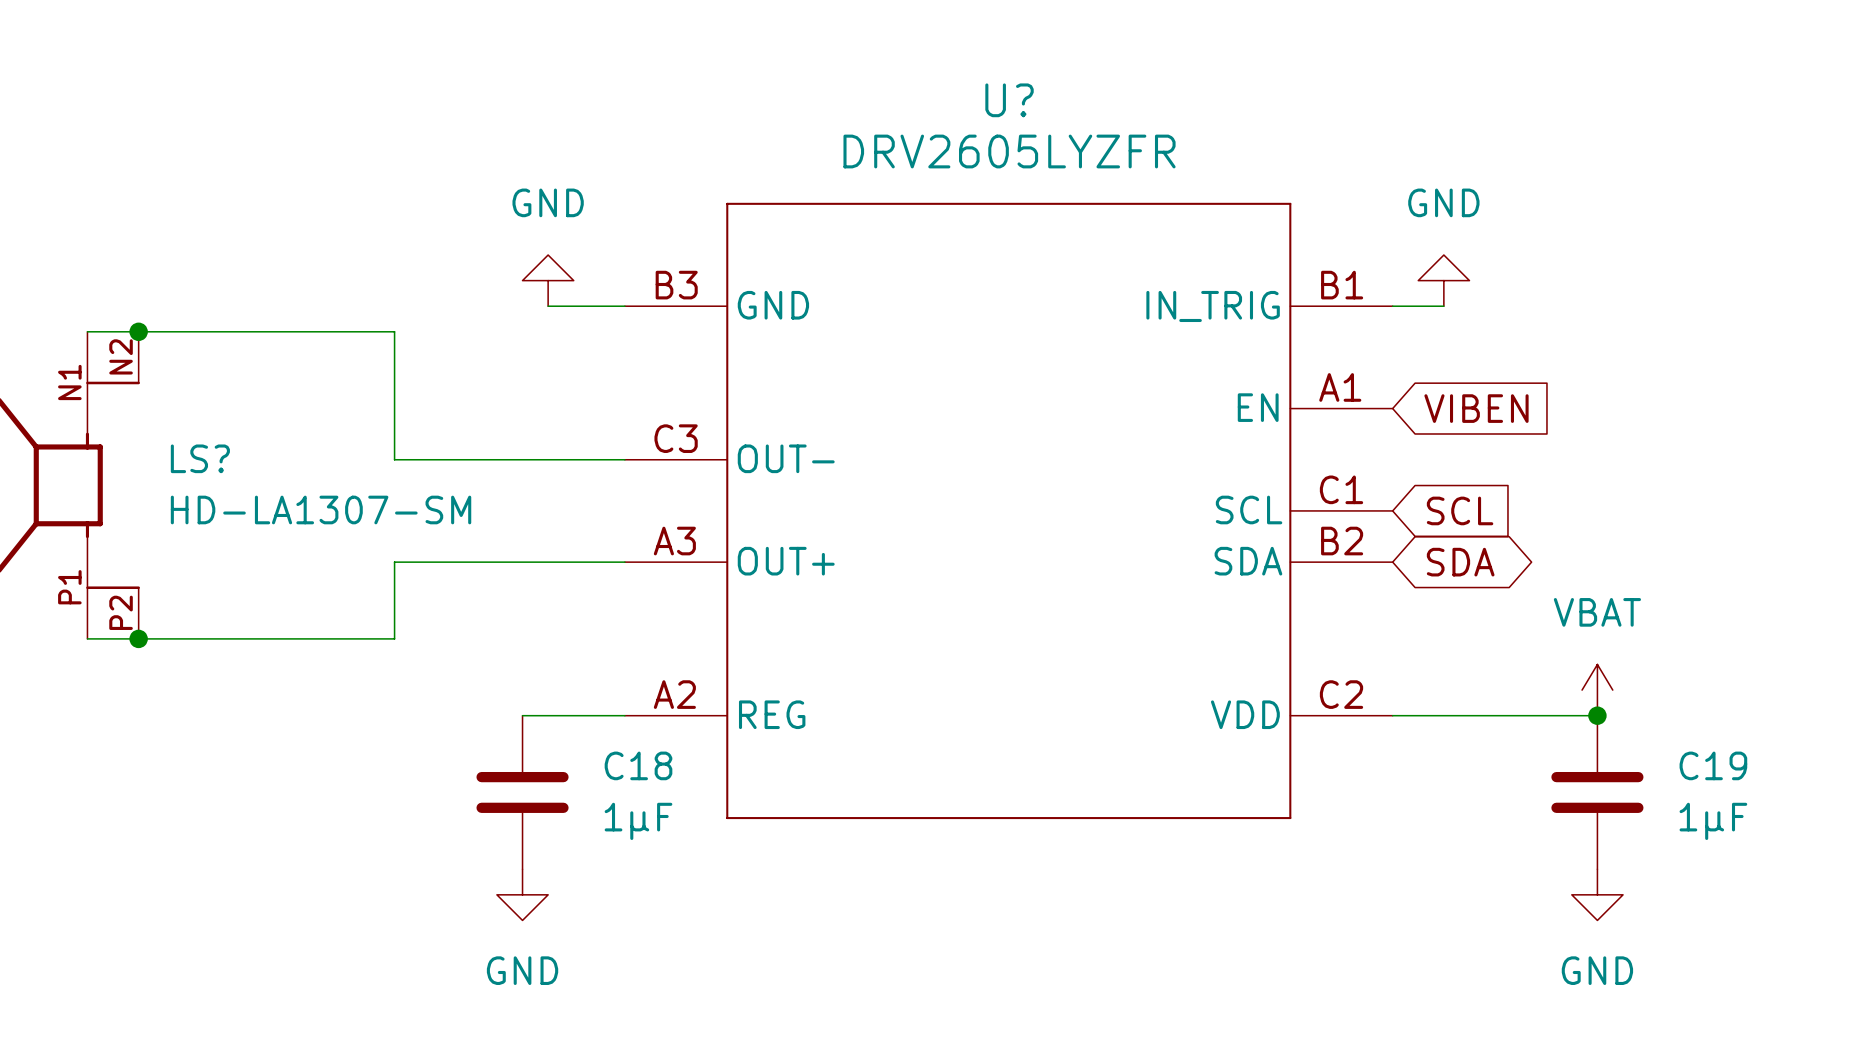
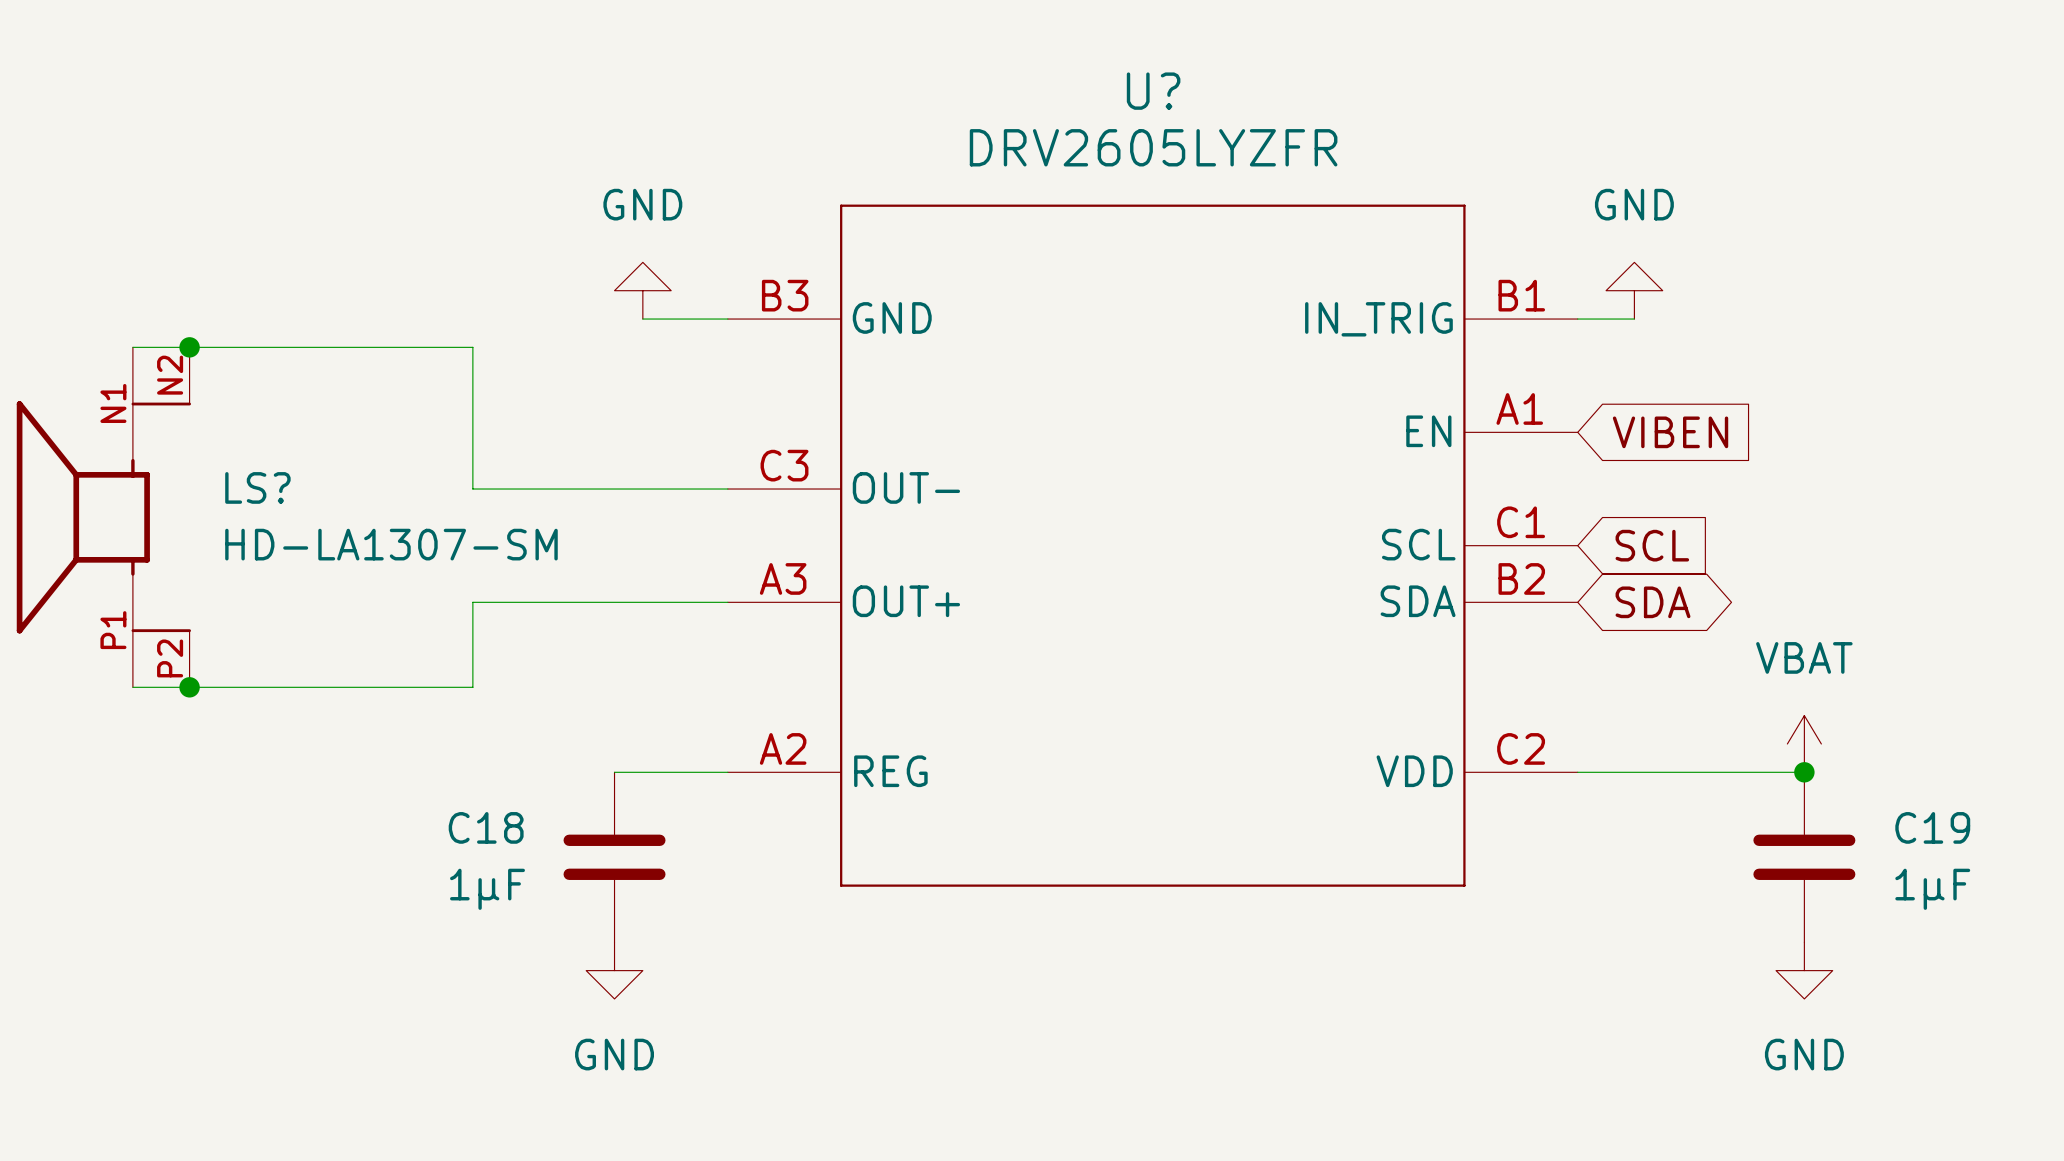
C18 name position: C18 (638, 765) -> C18 (486, 827)
C18 value position: 1µF (638, 821) -> 1µF (487, 889)

